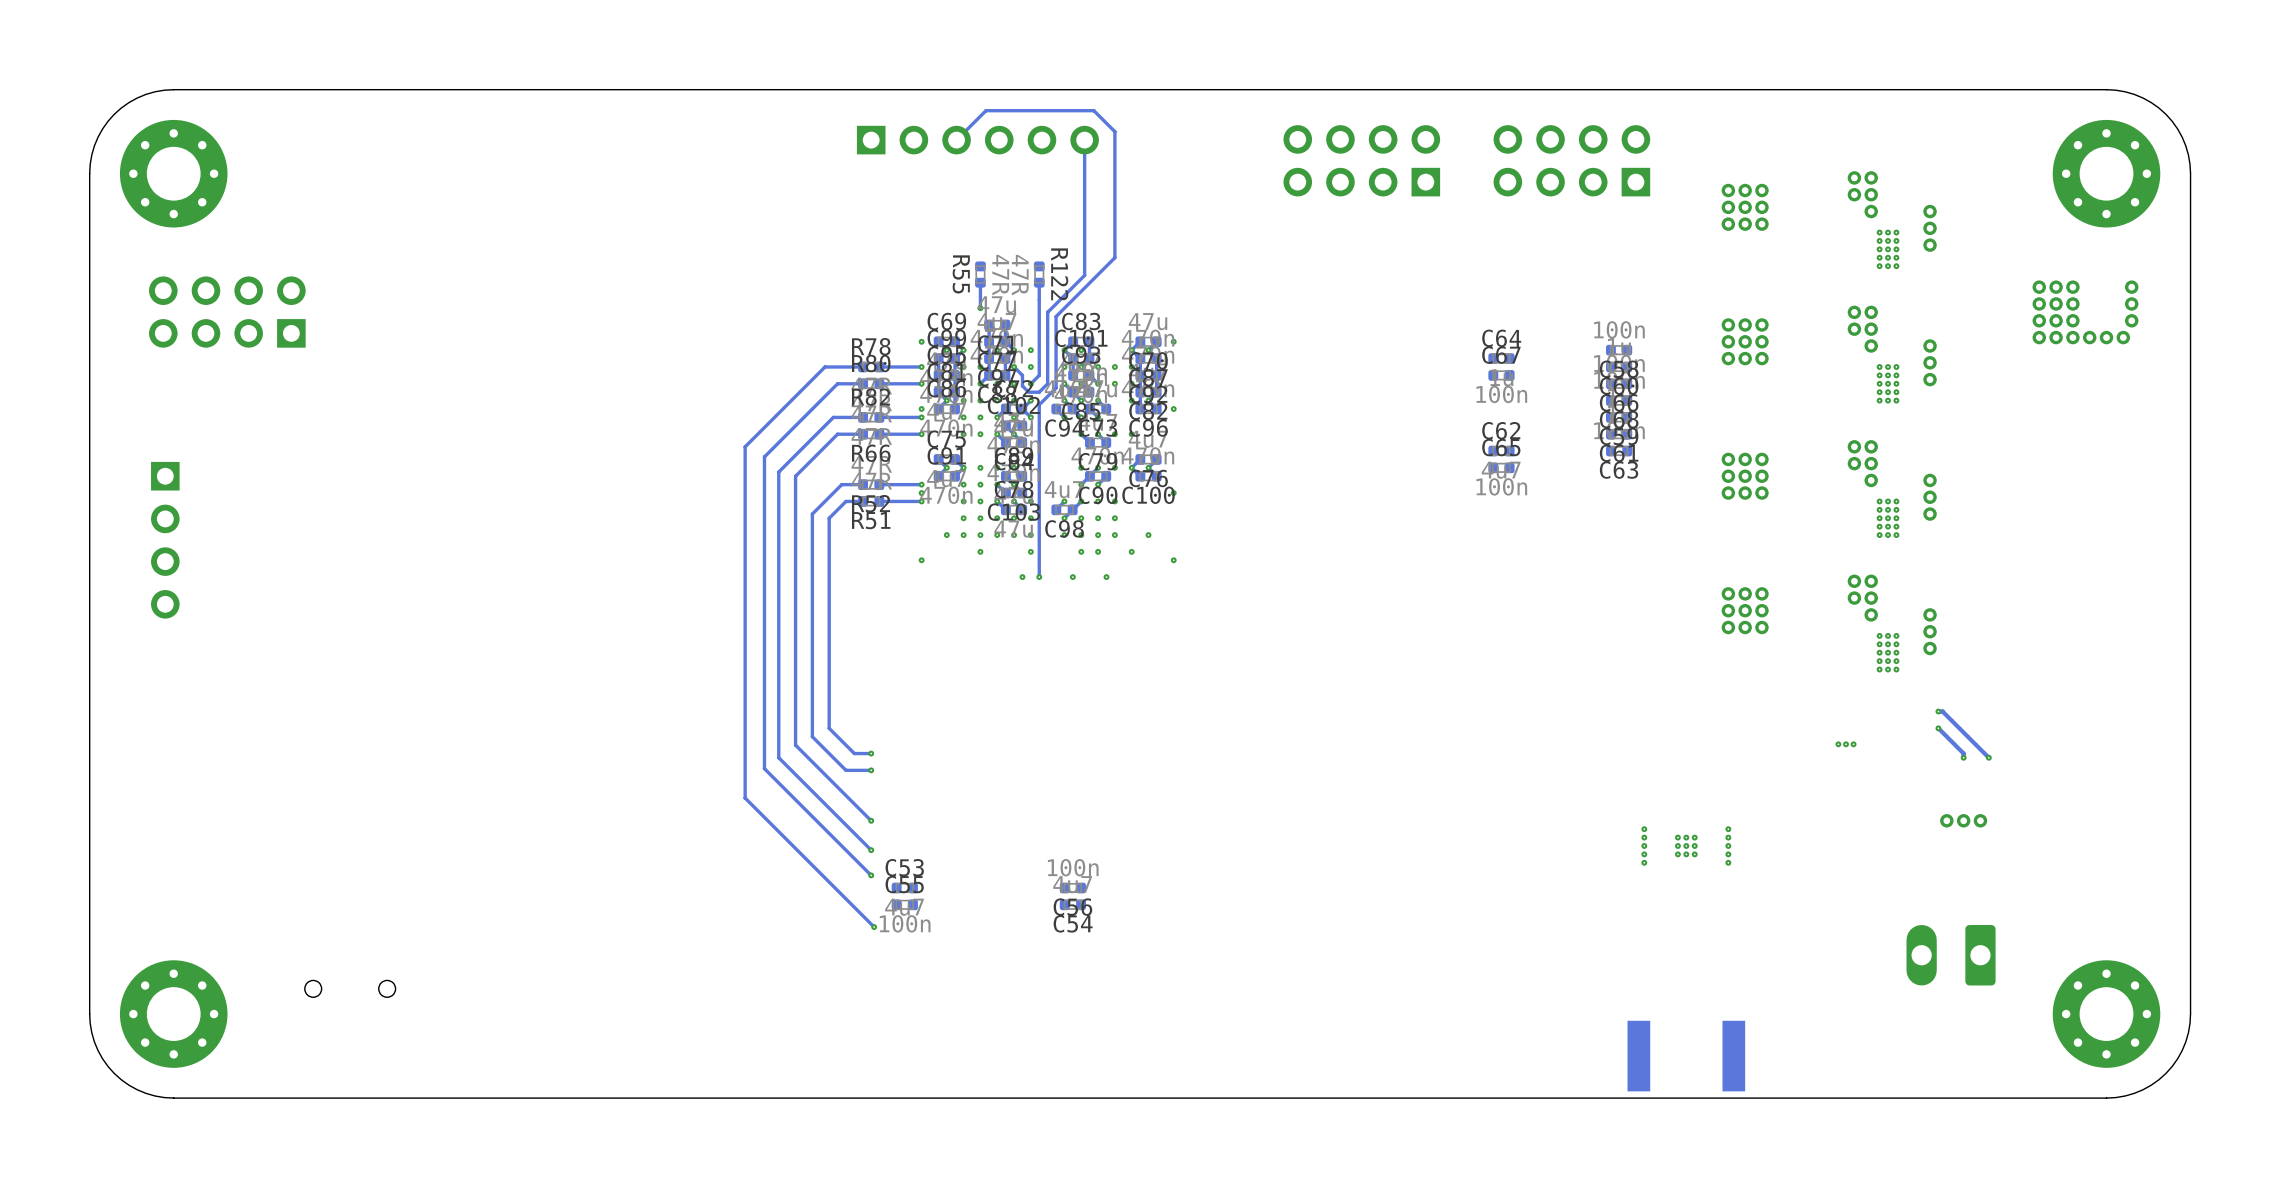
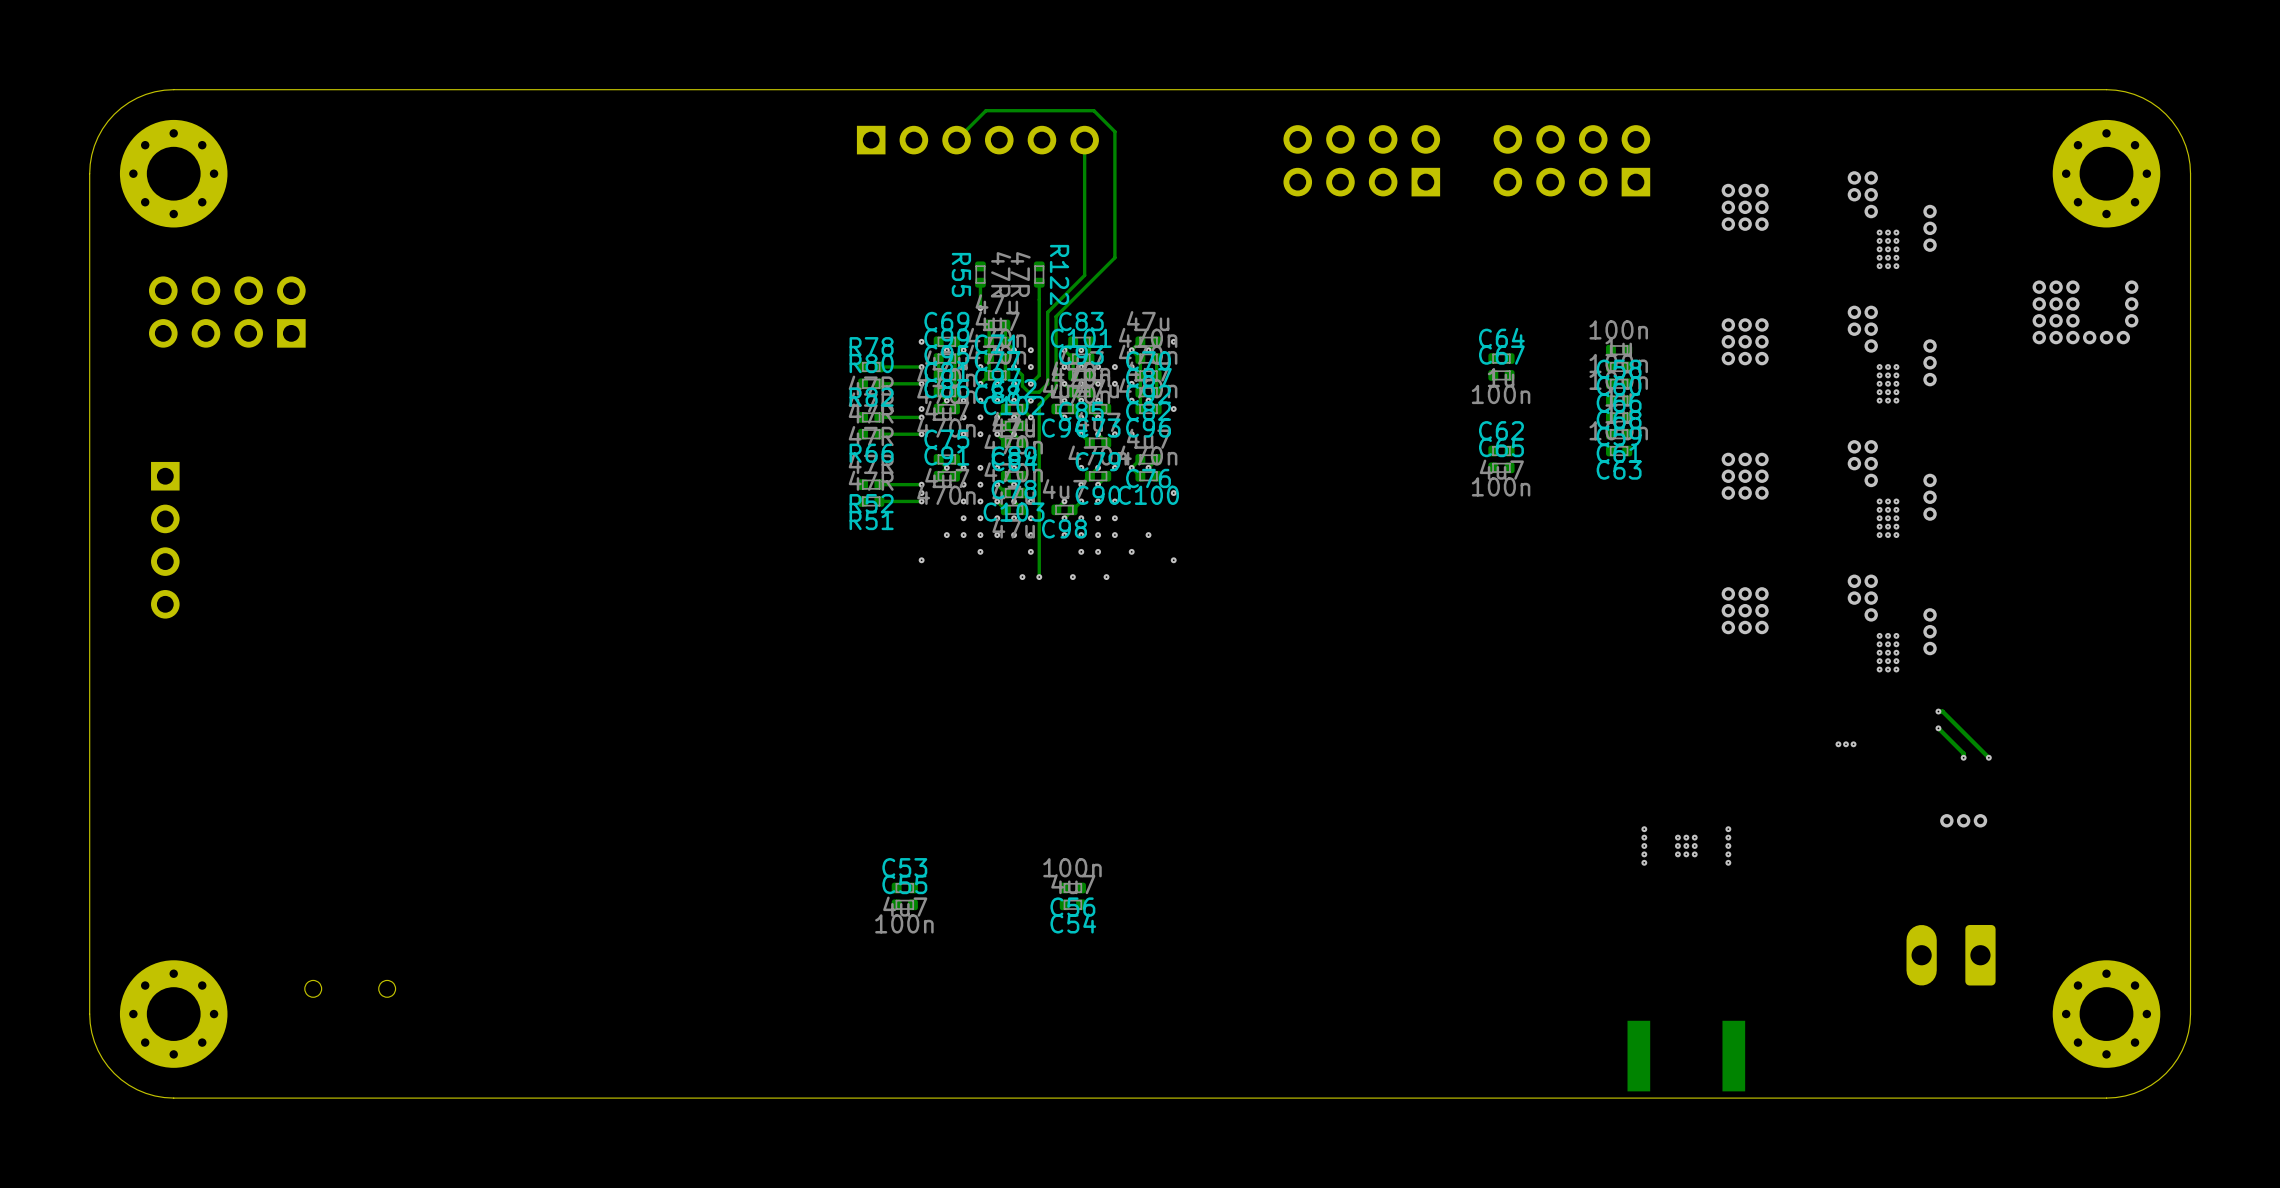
track: (863, 366) (824, 366) (745, 446) (745, 798) (874, 927) -> none
track: (863, 383) (837, 383) (764, 456) (764, 768) (871, 875) -> none
track: (863, 417) (833, 417) (778, 472) (778, 757) (871, 850) -> none
track: (863, 434) (837, 434) (795, 476) (795, 745) (871, 820) -> none
track: (863, 484) (841, 484) (812, 514) (812, 736) (845, 770) (871, 770) -> none
track: (863, 501) (845, 501) (829, 518) (829, 728) (854, 753) (871, 753) -> none
via: (871, 753) -> none
via: (871, 770) -> none
via: (871, 820) -> none
via: (871, 850) -> none
via: (871, 875) -> none
via: (874, 927) -> none

